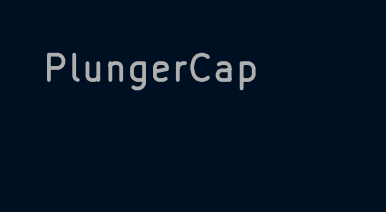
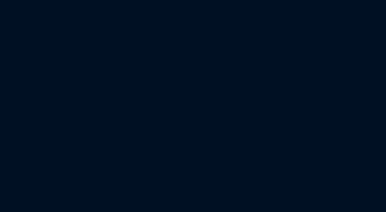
drawing: [47, 52, 256, 91] -> none

